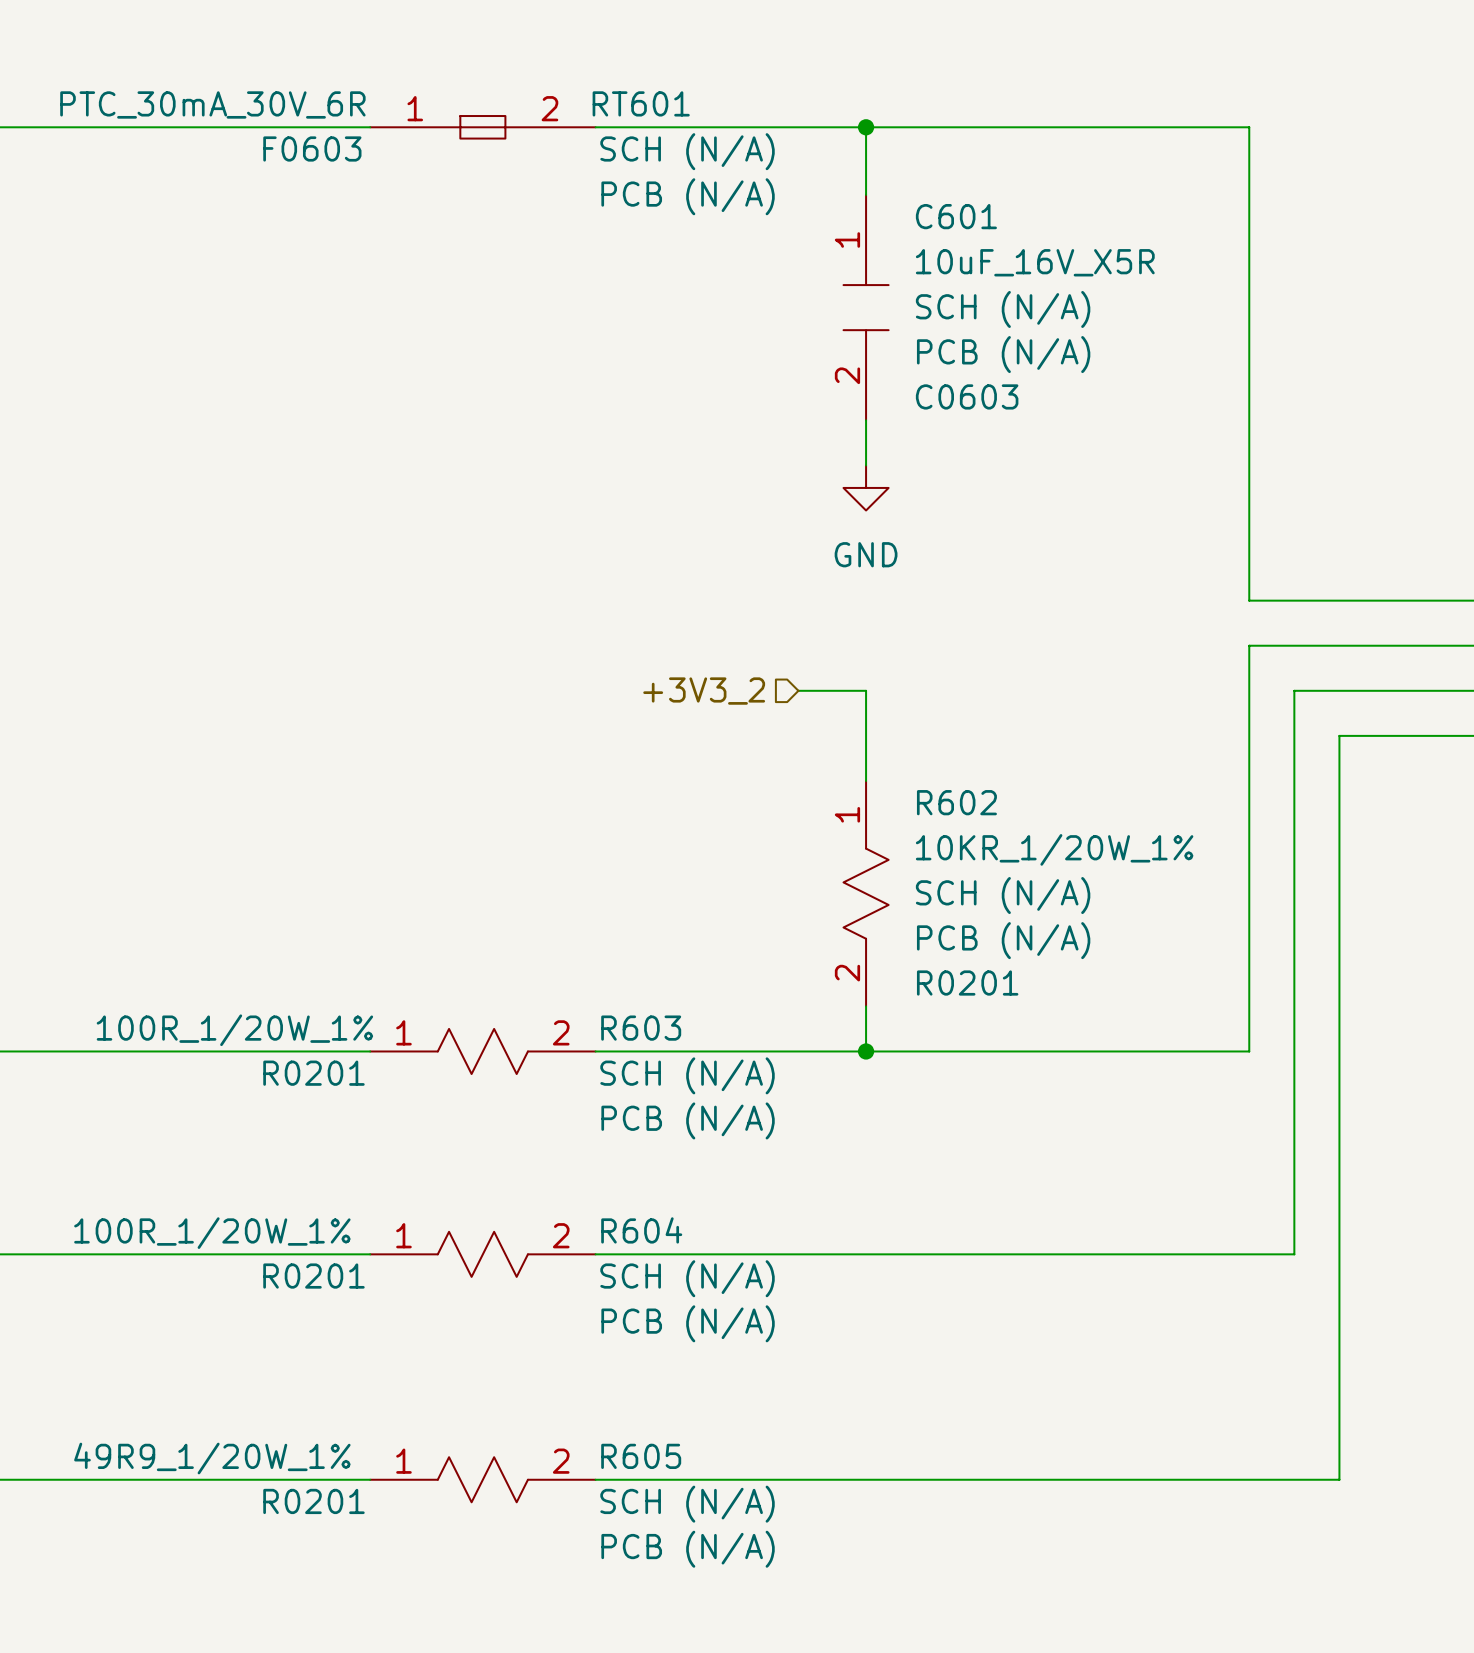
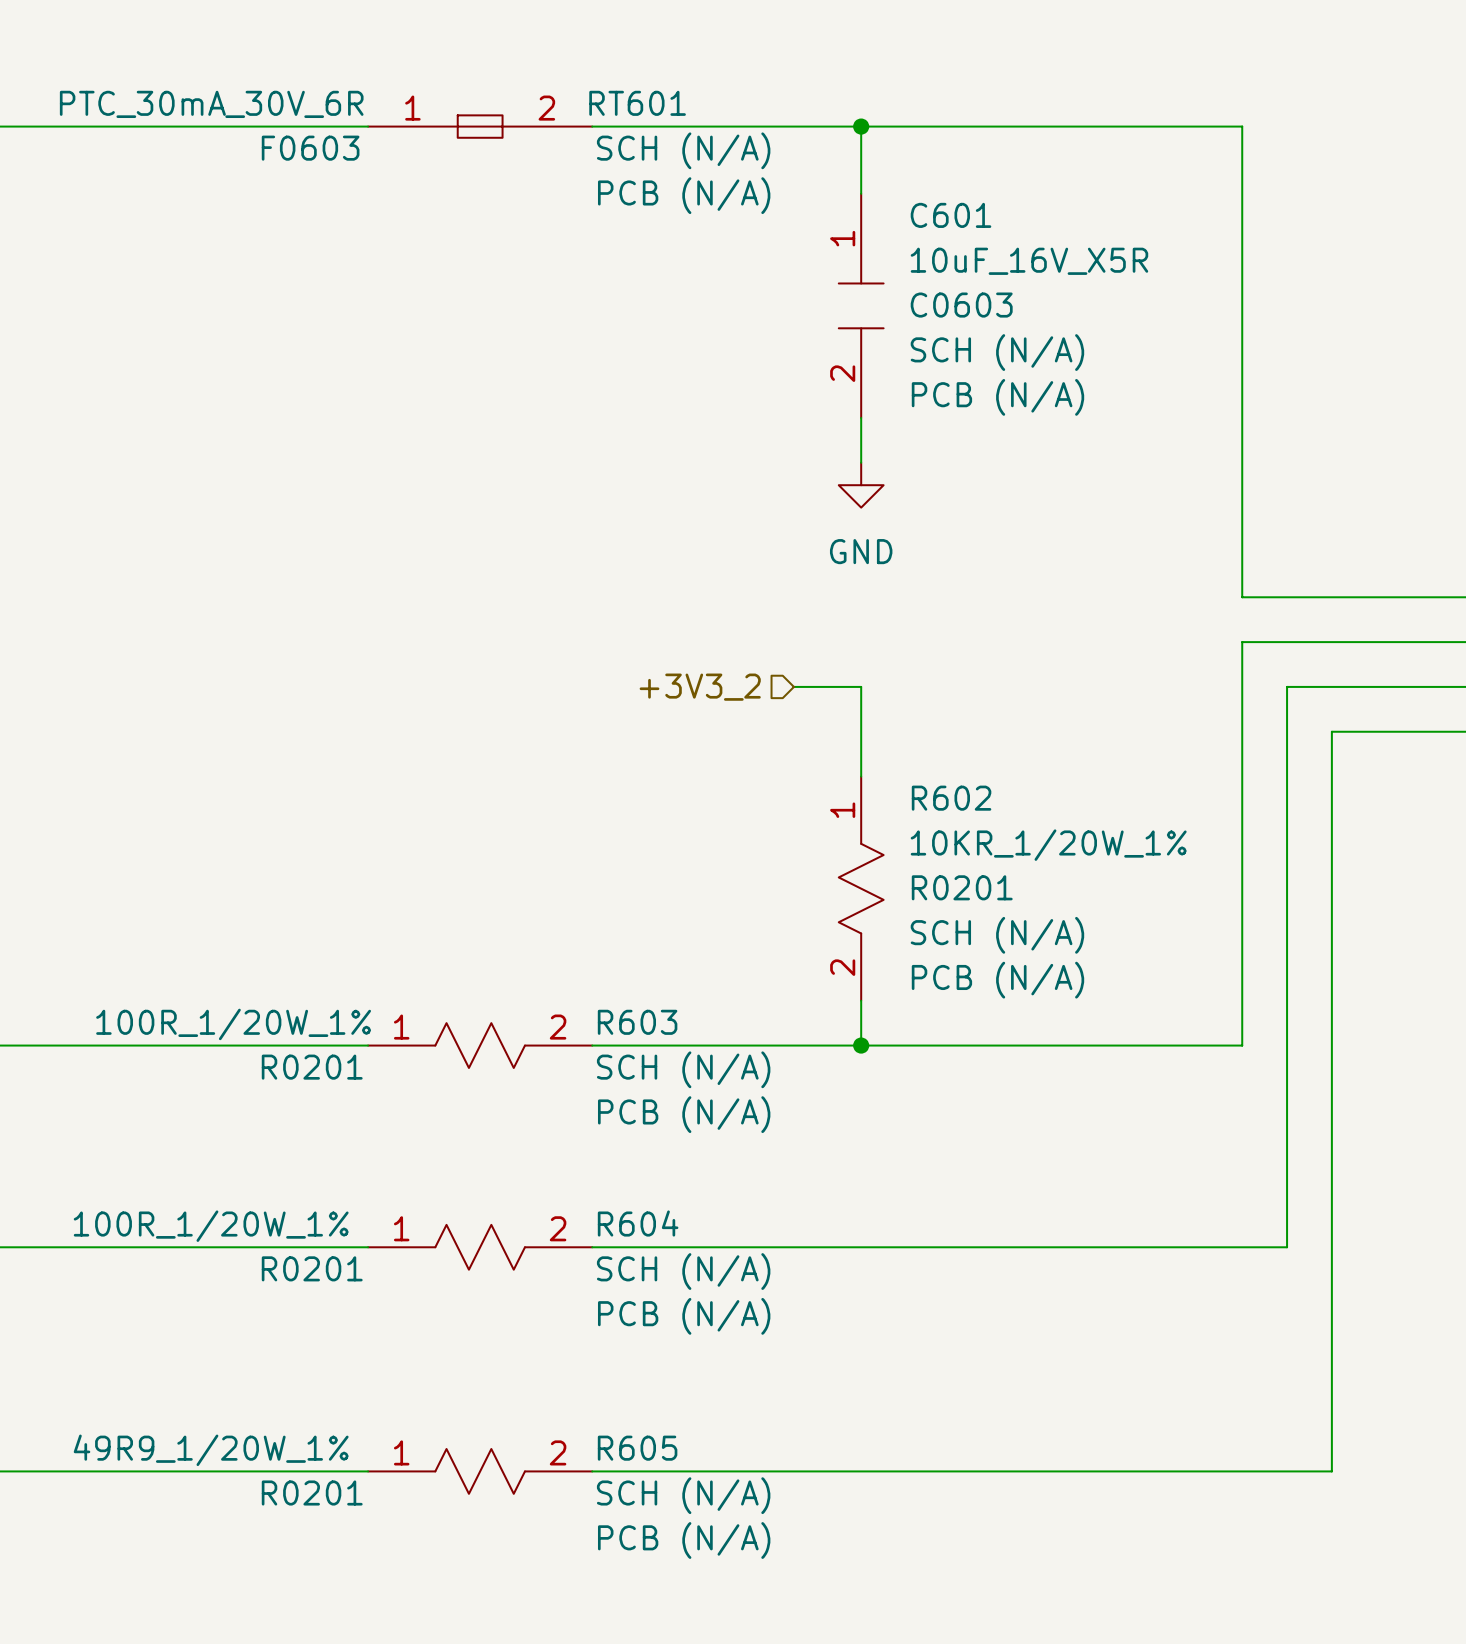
C601 text position: SCH (N/A) (1003, 309) -> SCH (N/A) (997, 352)
C601 text position: PCB (N/A) (1003, 354) -> PCB (N/A) (997, 397)
C601 text position: C0603 (967, 396) -> C0603 (961, 305)
R602 text position: SCH (N/A) (1003, 895) -> SCH (N/A) (997, 935)
R602 text position: PCB (N/A) (1003, 940) -> PCB (N/A) (997, 980)
R602 text position: R0201 (967, 983) -> R0201 (962, 887)

